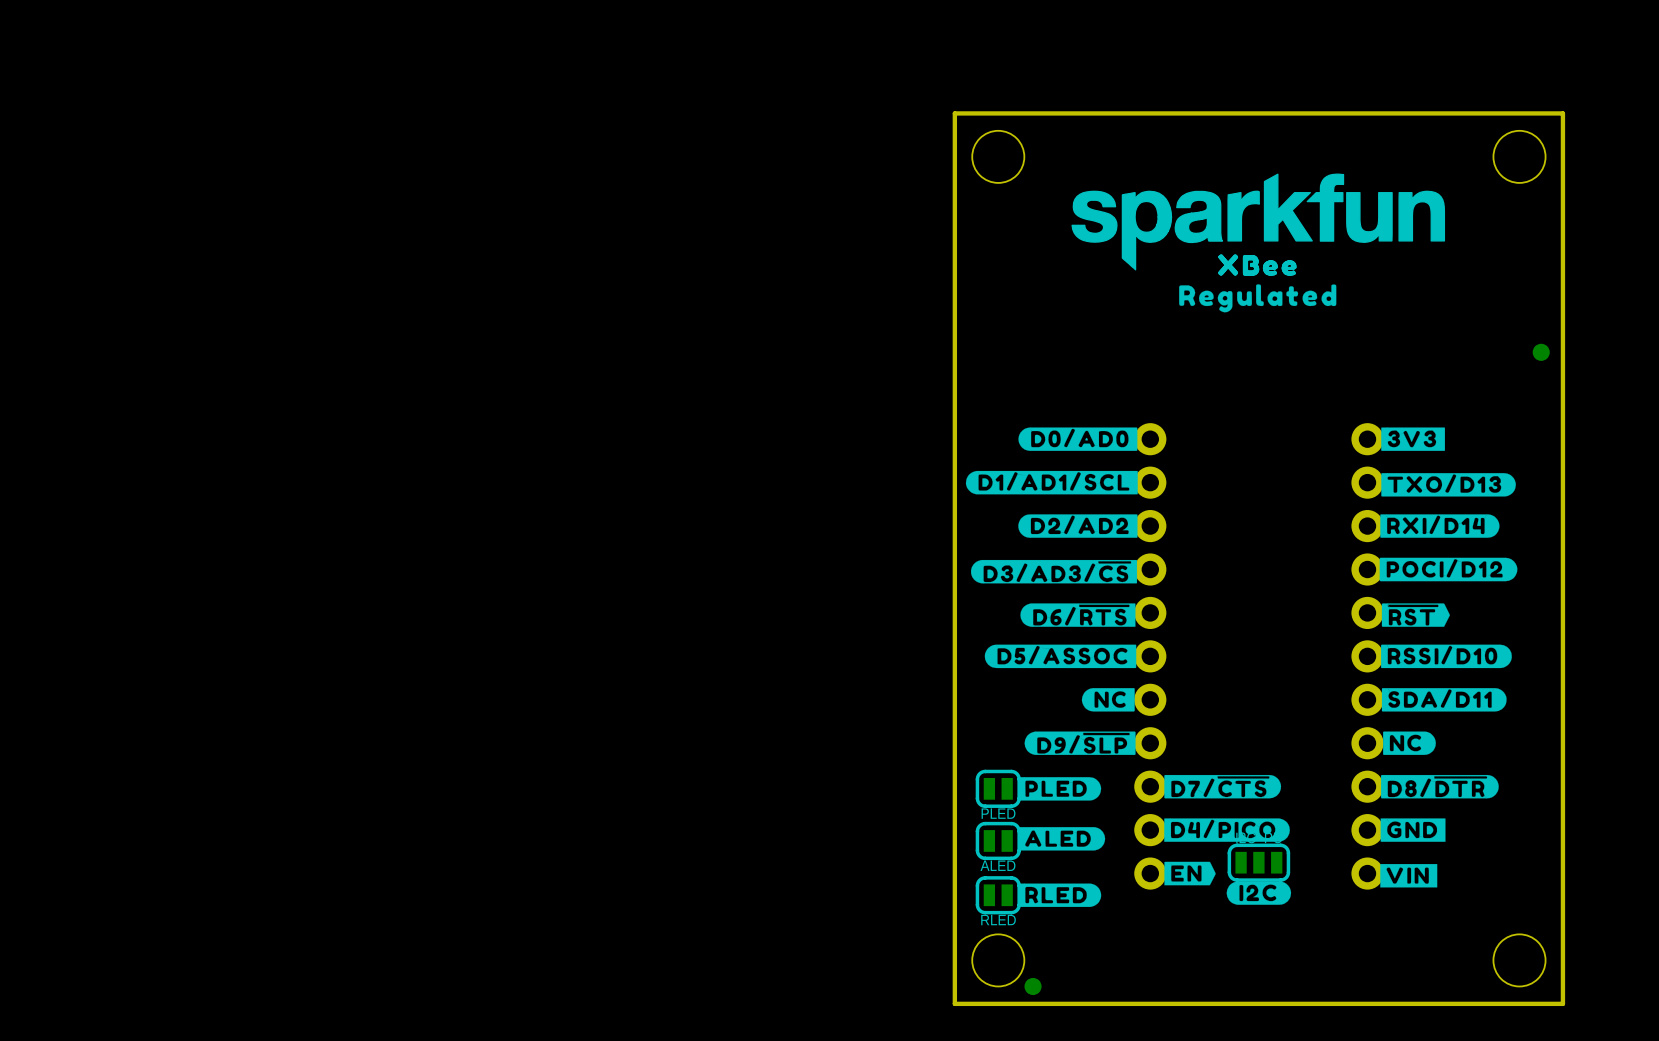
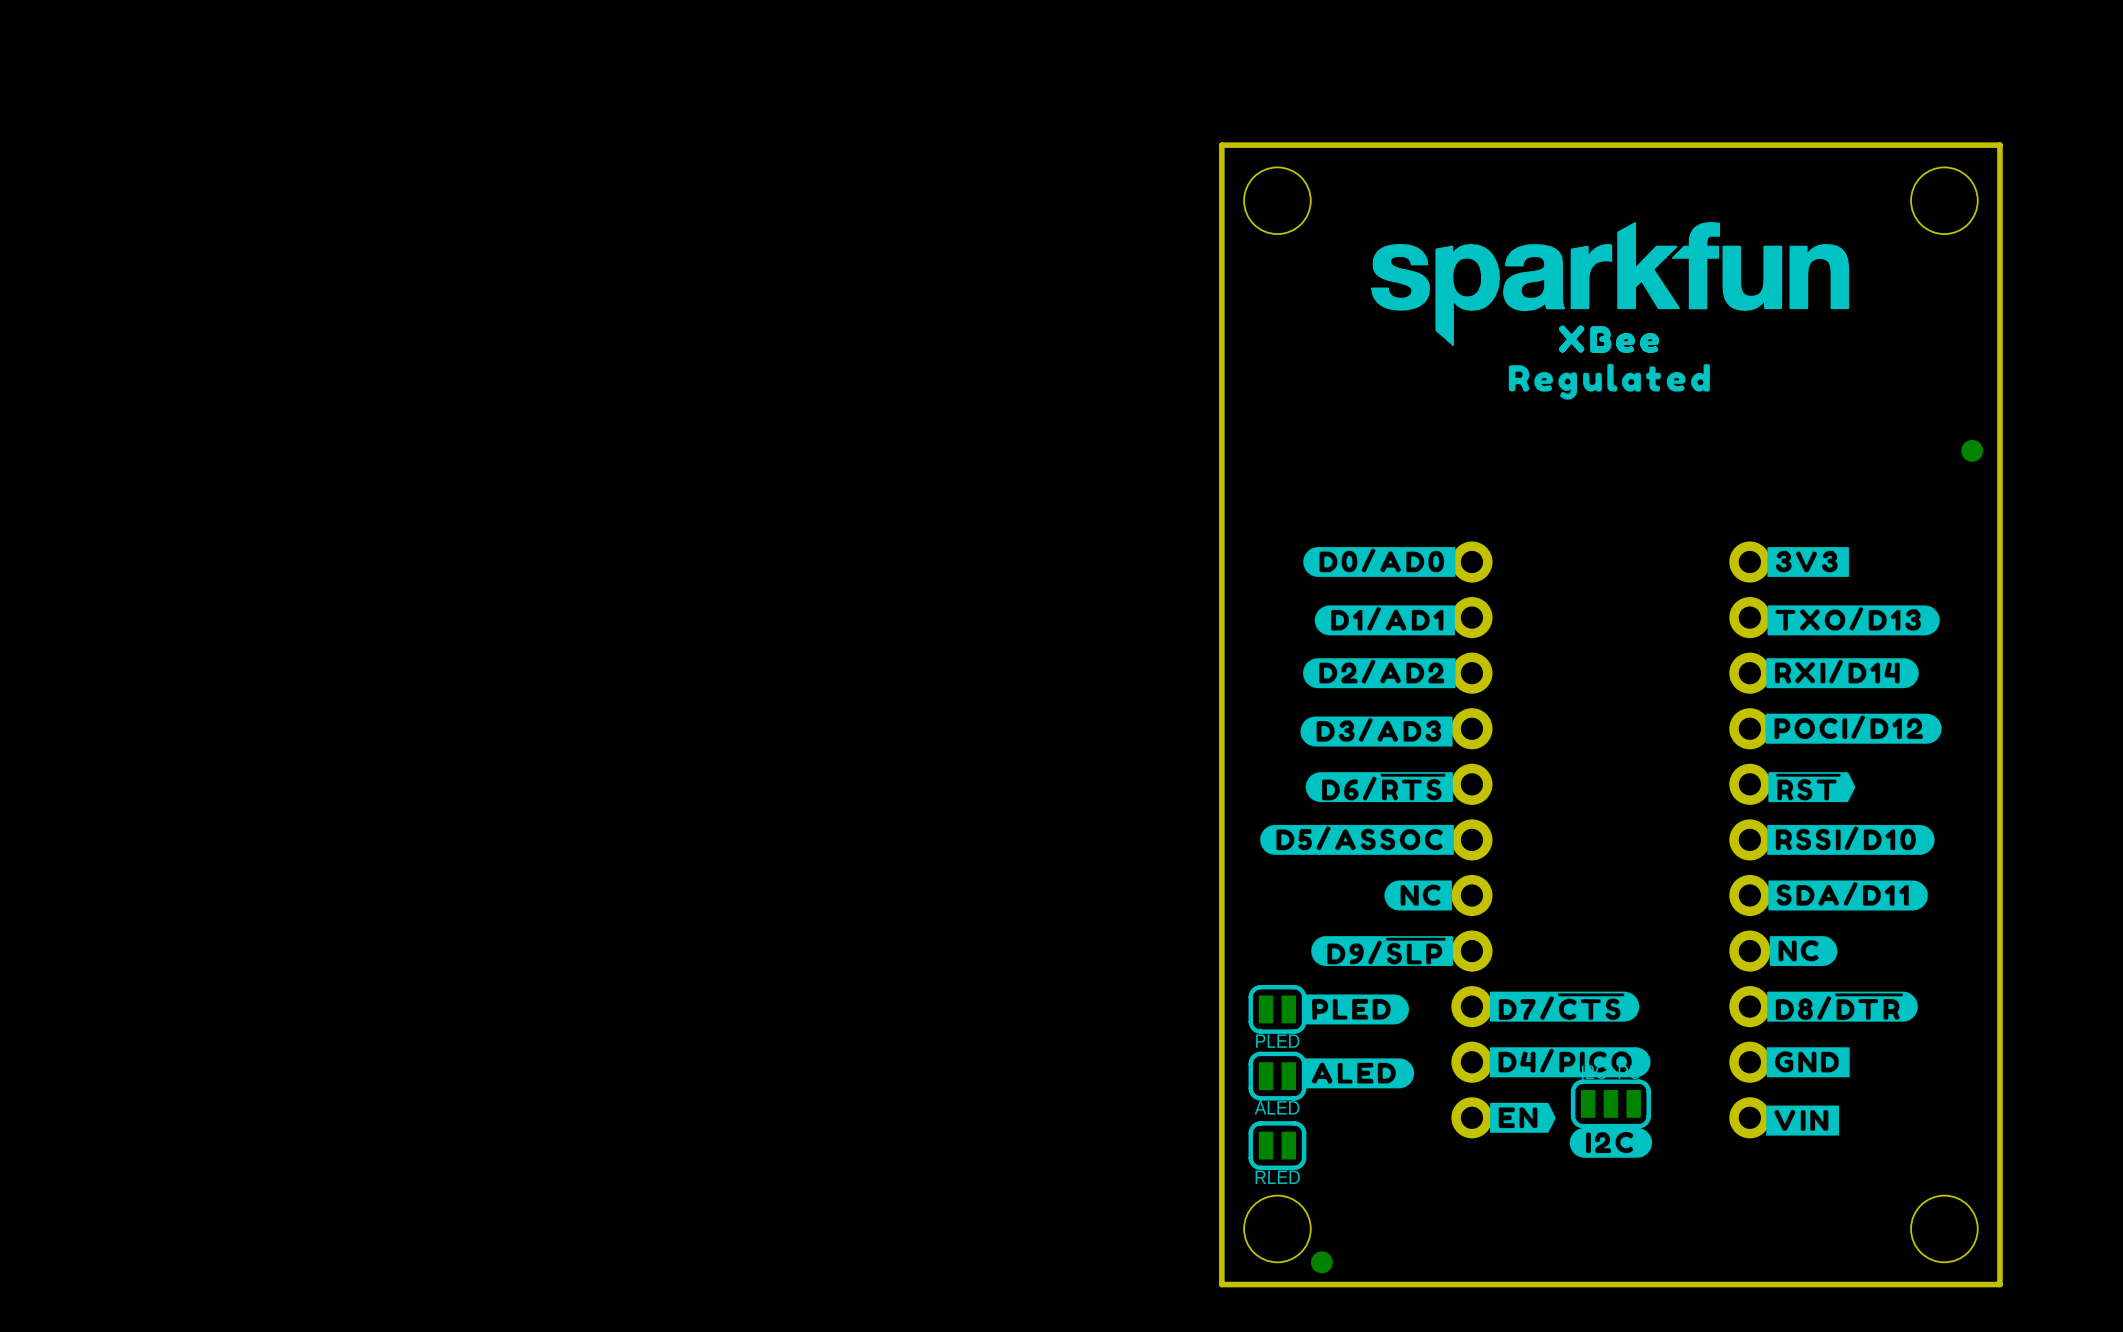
drawing: [965, 470, 1138, 495] -> none
drawing: none -> [1314, 605, 1455, 636]
drawing: [970, 559, 1138, 584] -> none
drawing: none -> [1300, 716, 1453, 747]
drawing: [1018, 883, 1102, 907] -> none

